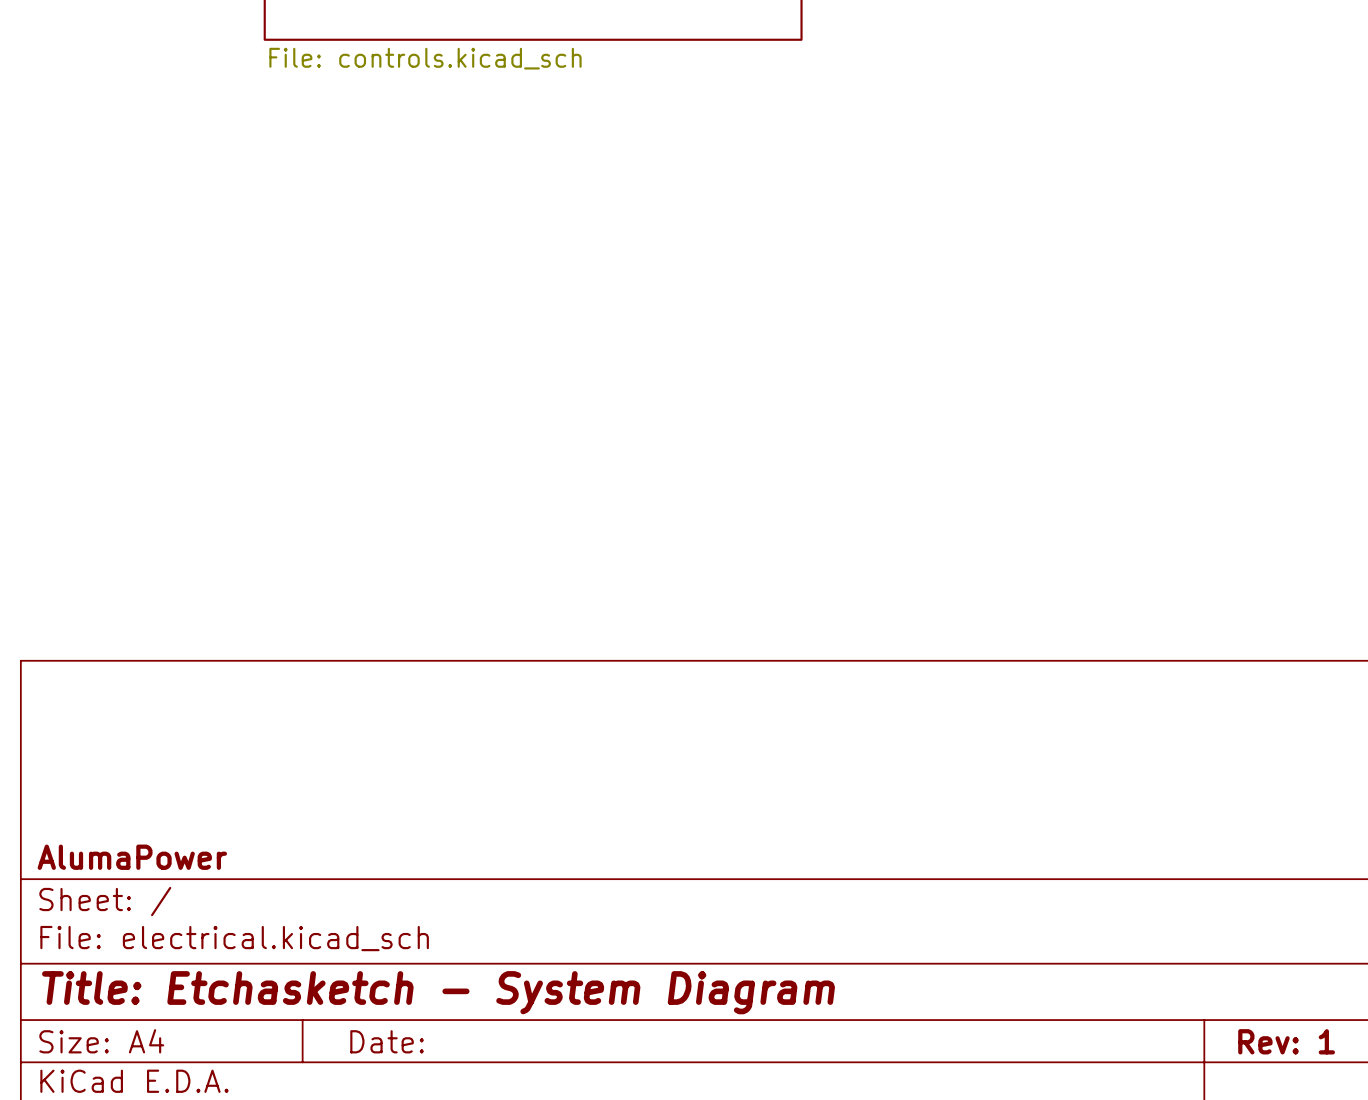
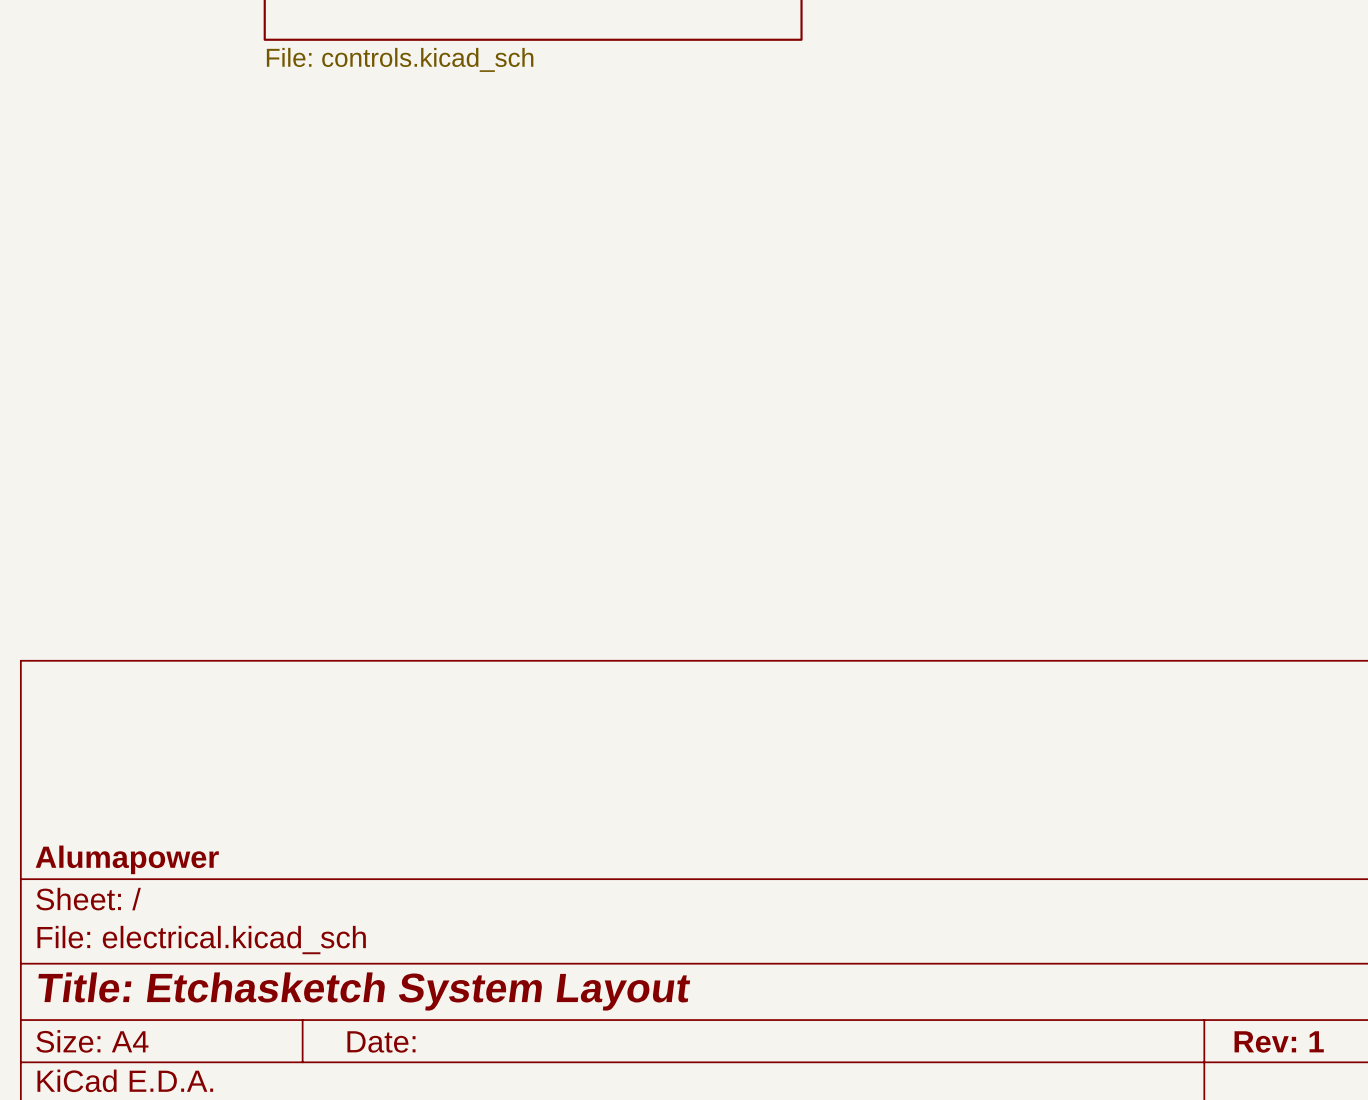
title block: AlumaPower (132, 857) -> Alumapower (127, 859)
title block: Title: Etchasketch - System Diagram (438, 992) -> Title: Etchasketch System Layout (364, 991)

